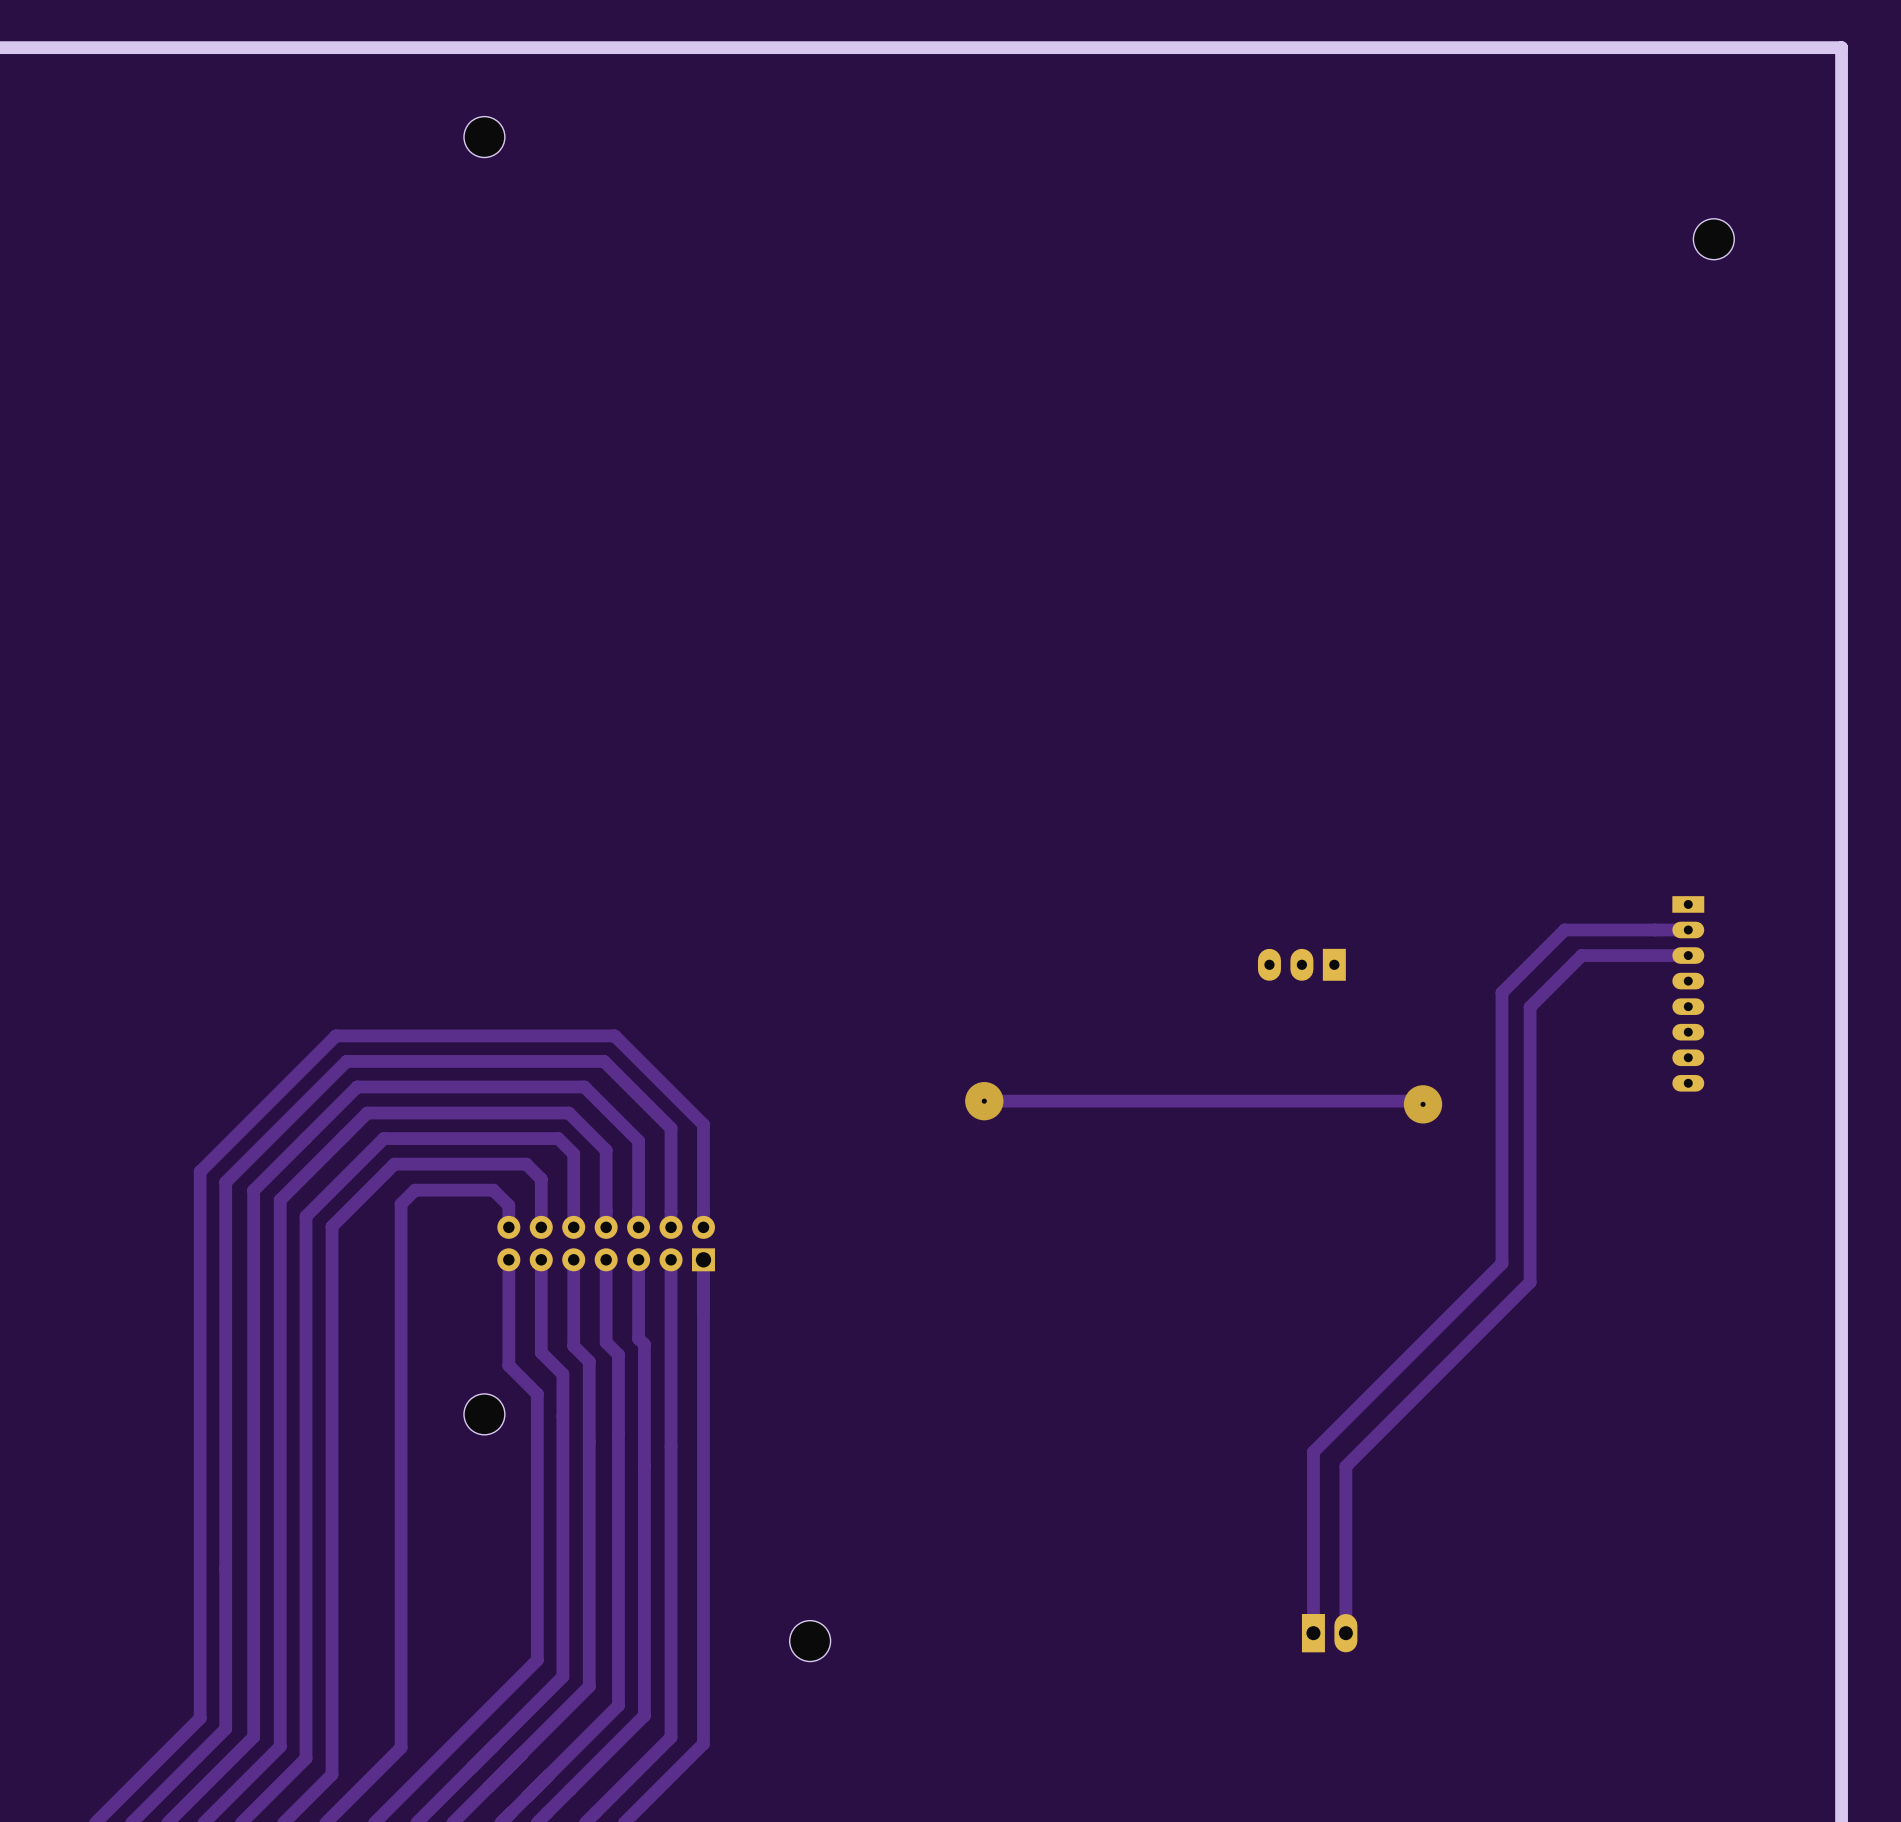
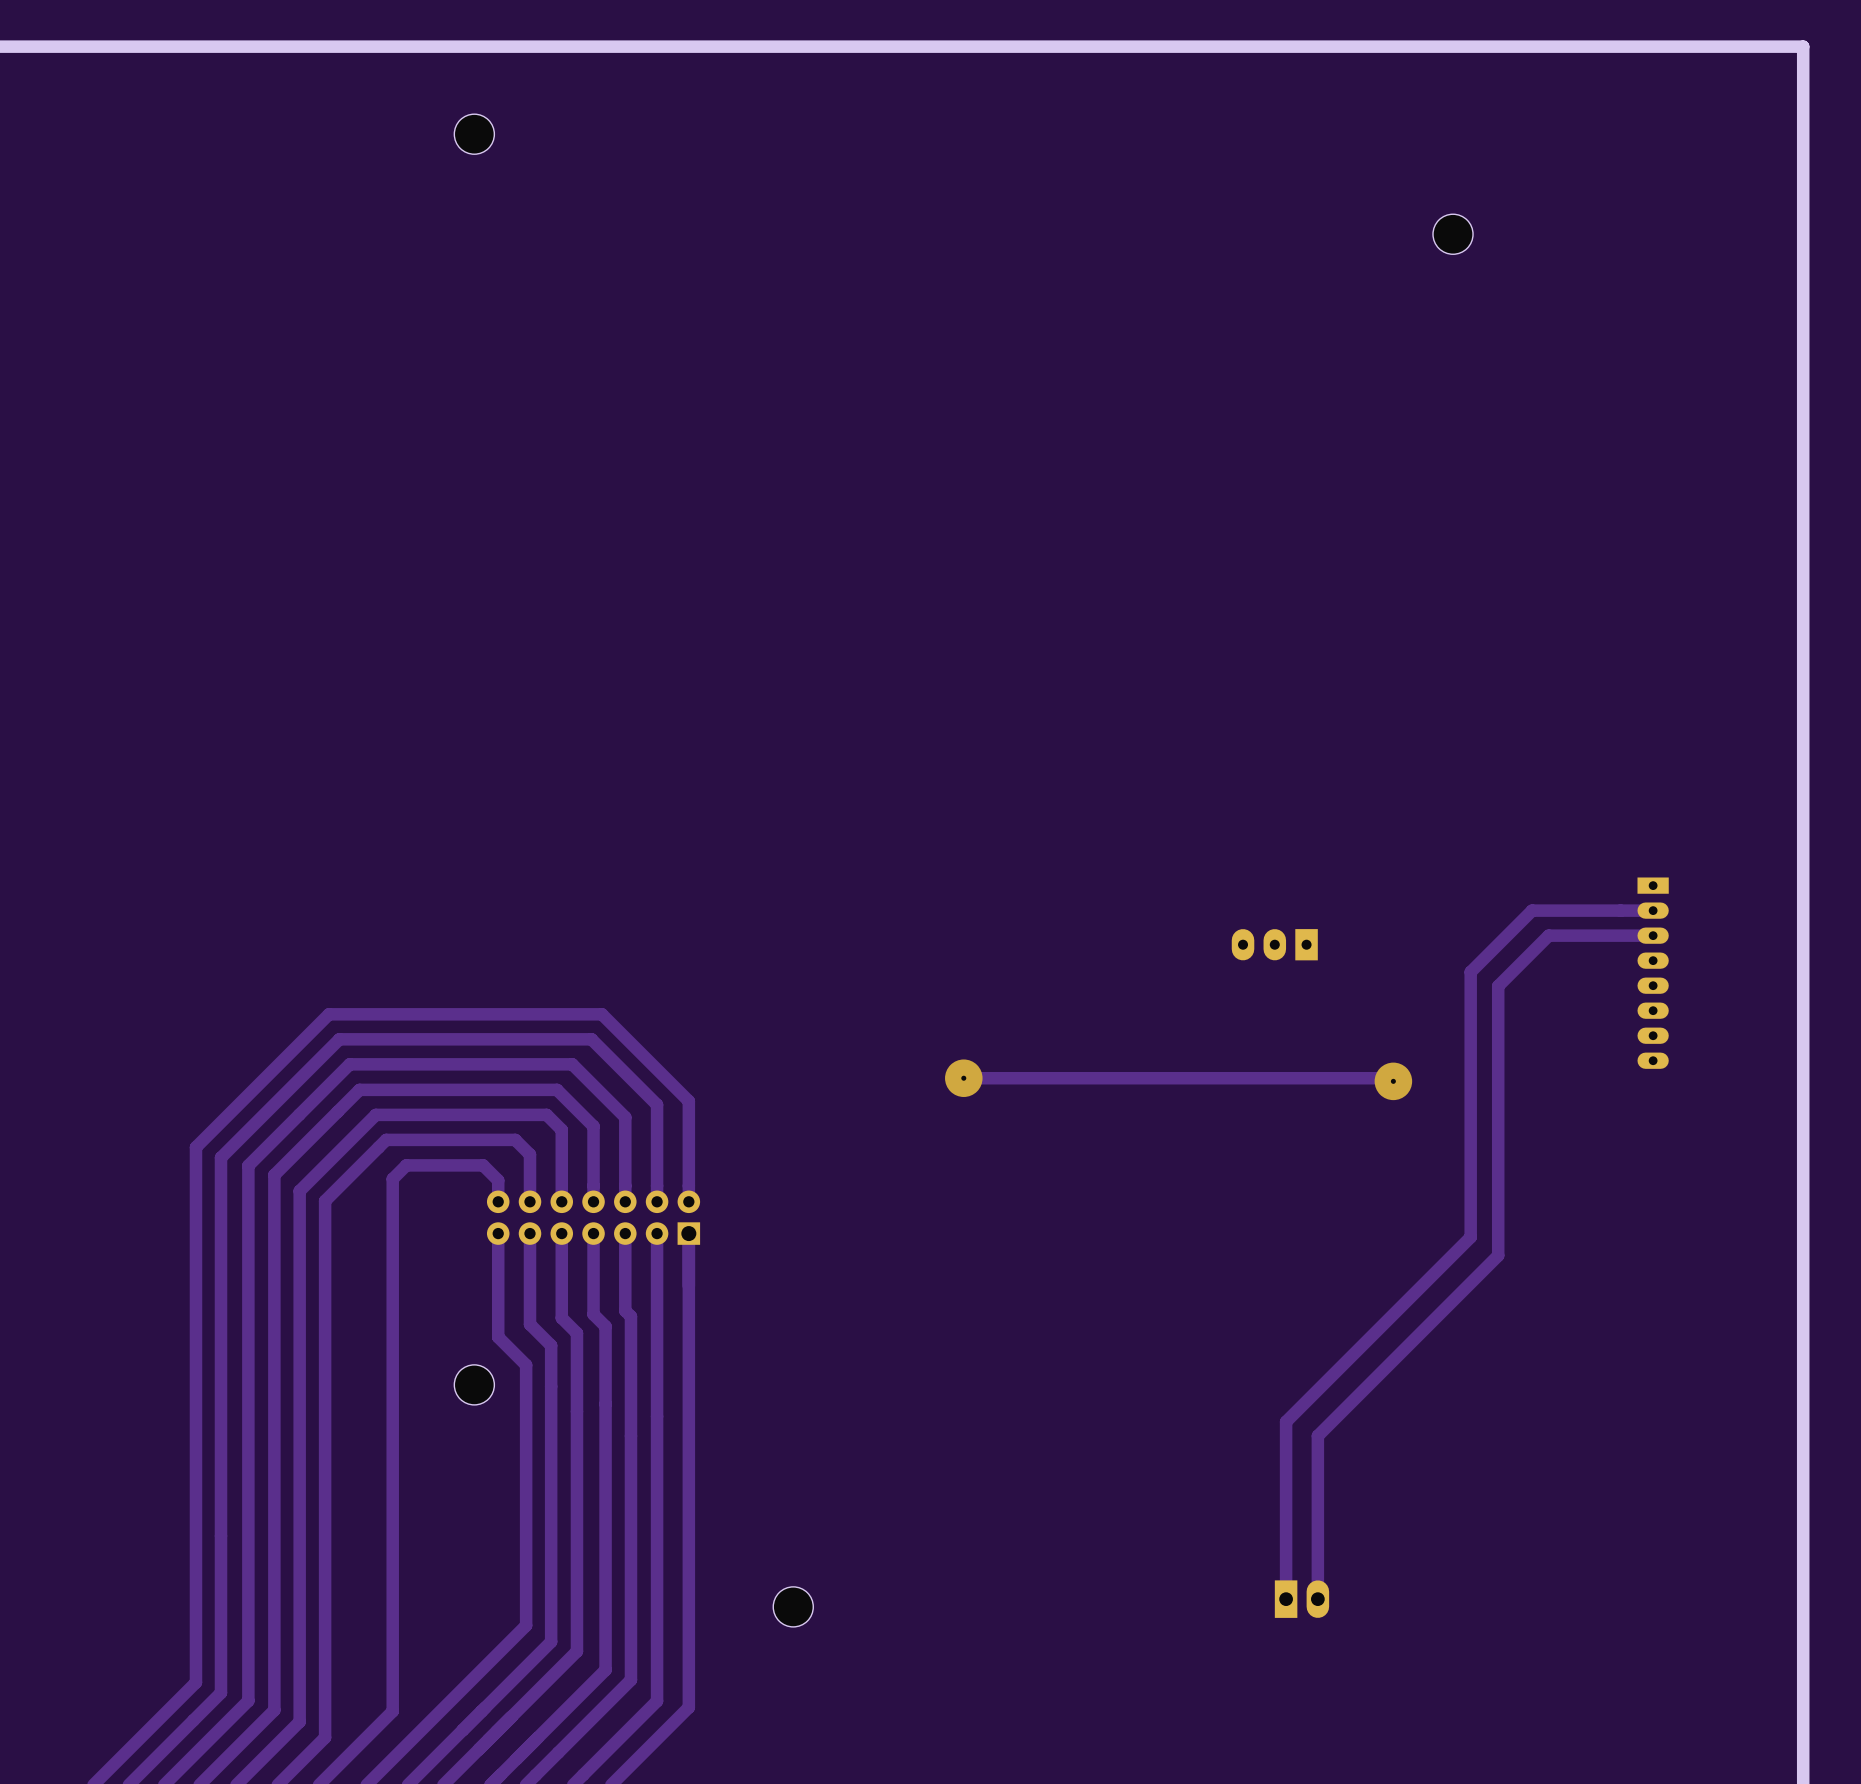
part position: (1713, 239) -> (1453, 234)

